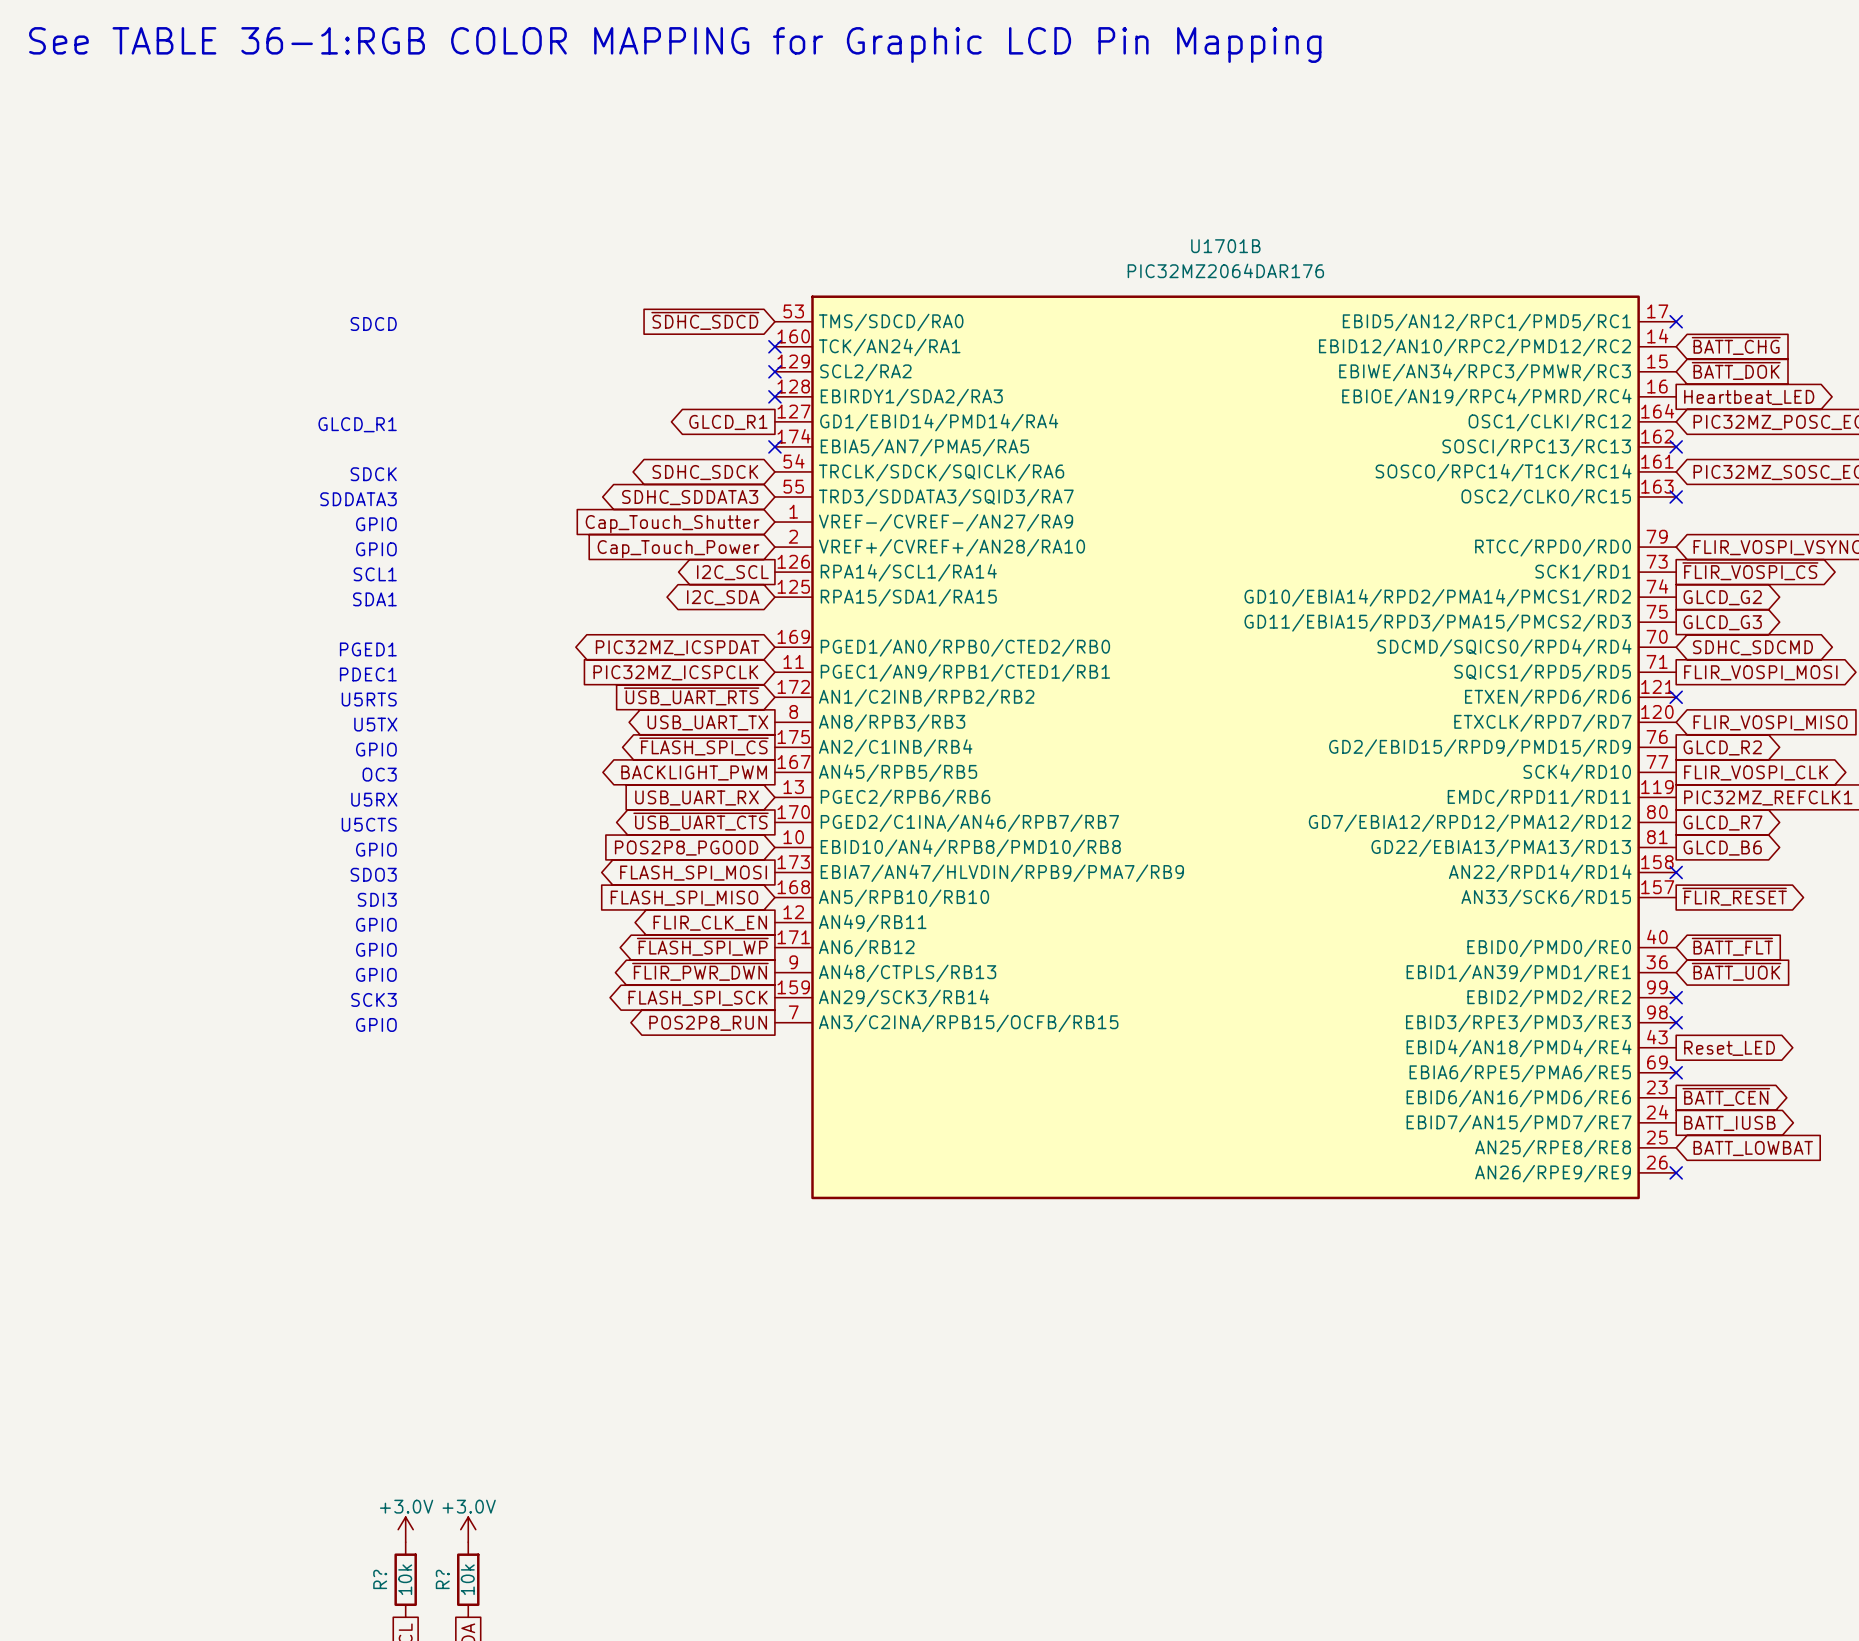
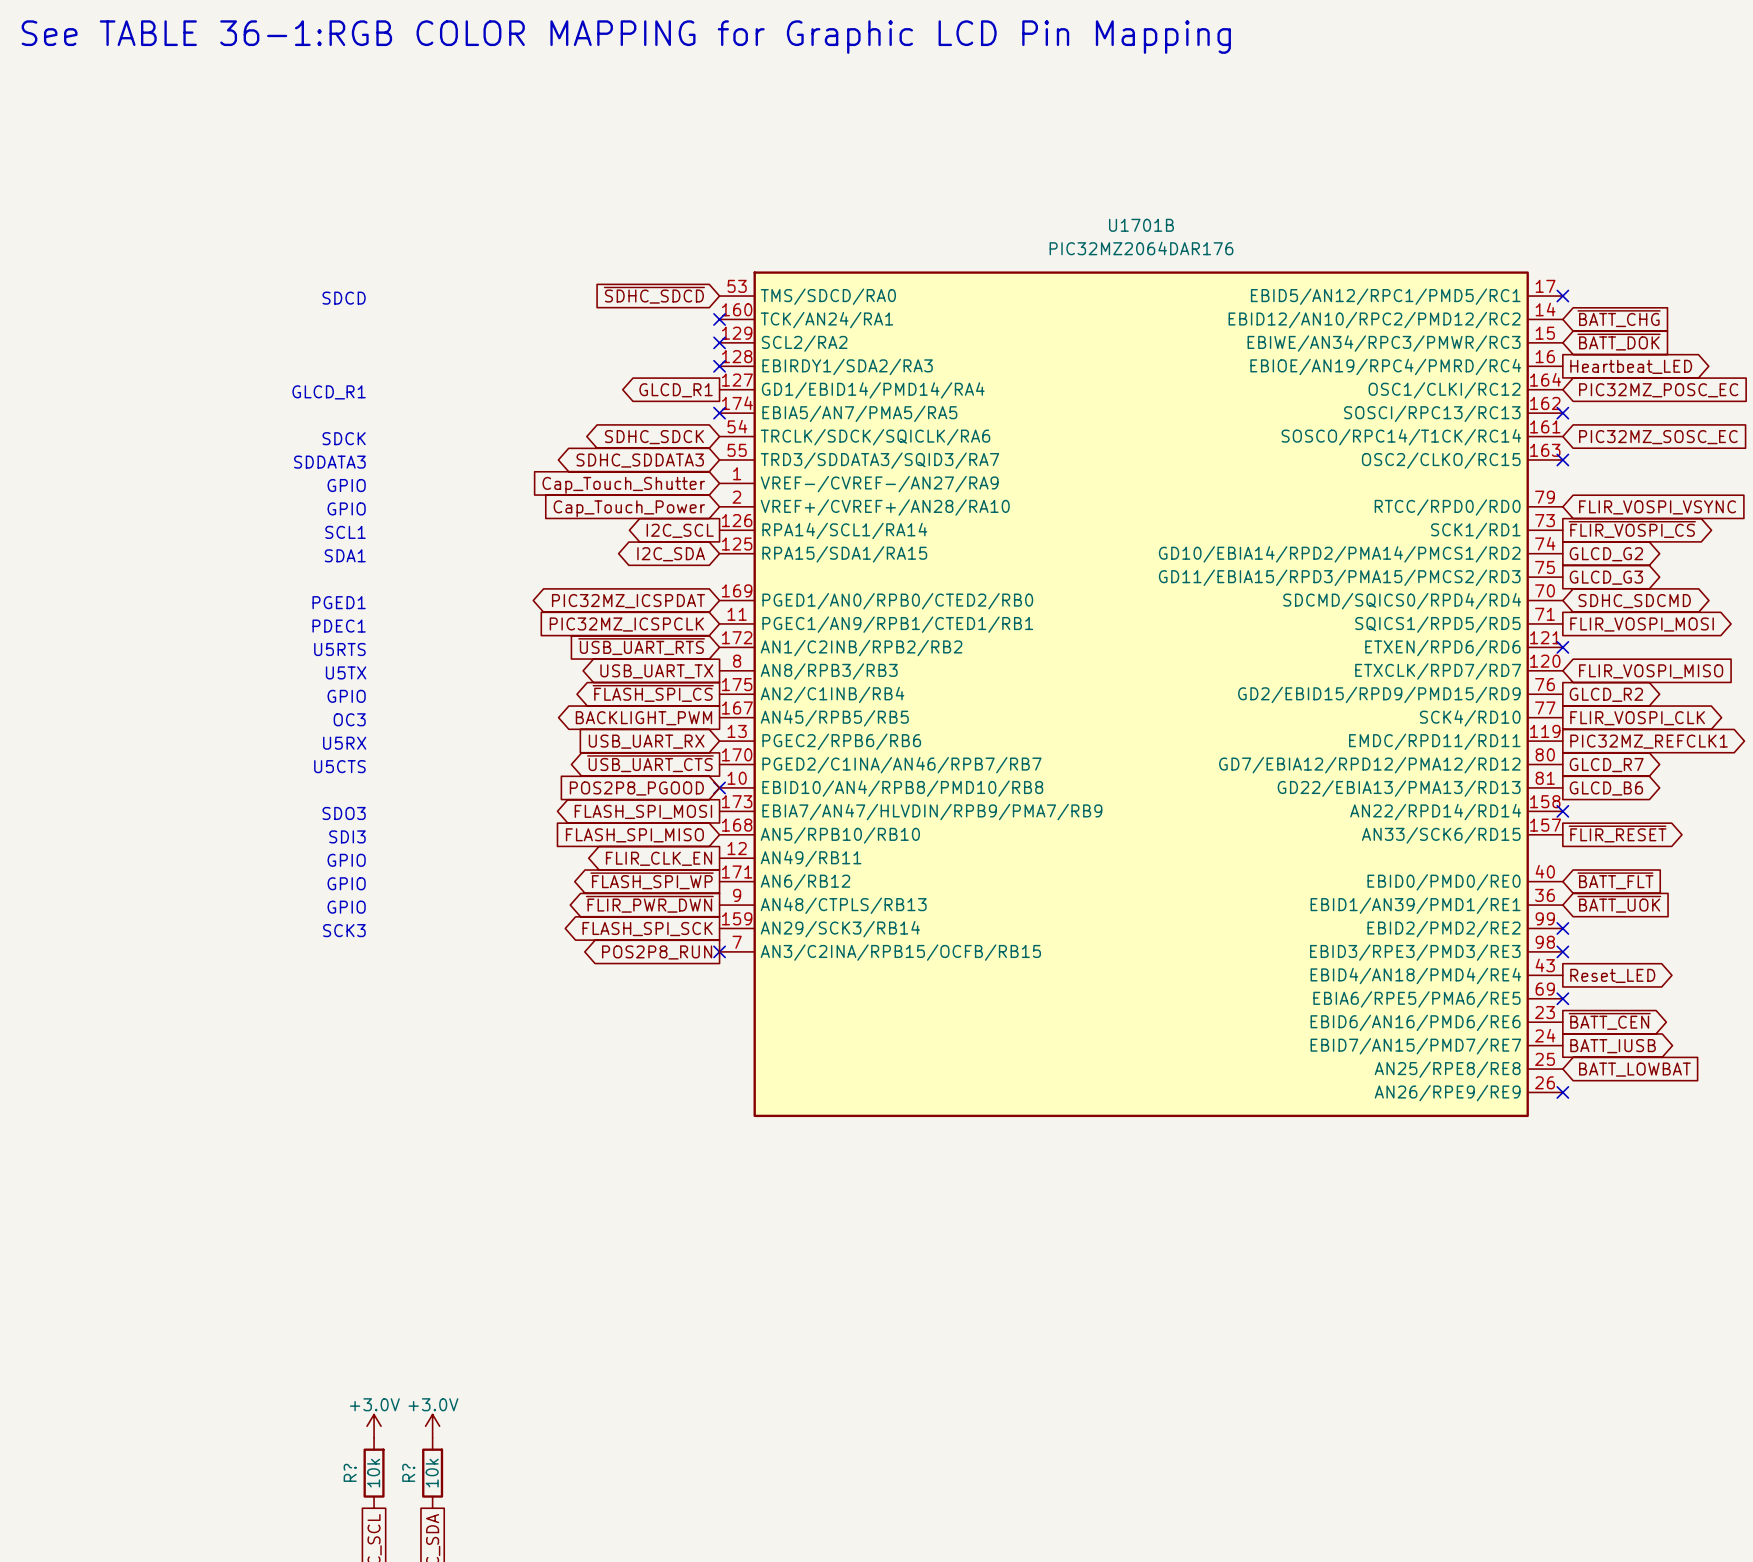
no-connect mark: none -> (719, 787)
text: GPIO (376, 849) -> none
no-connect mark: none -> (719, 951)
text: GPIO (376, 1024) -> none

